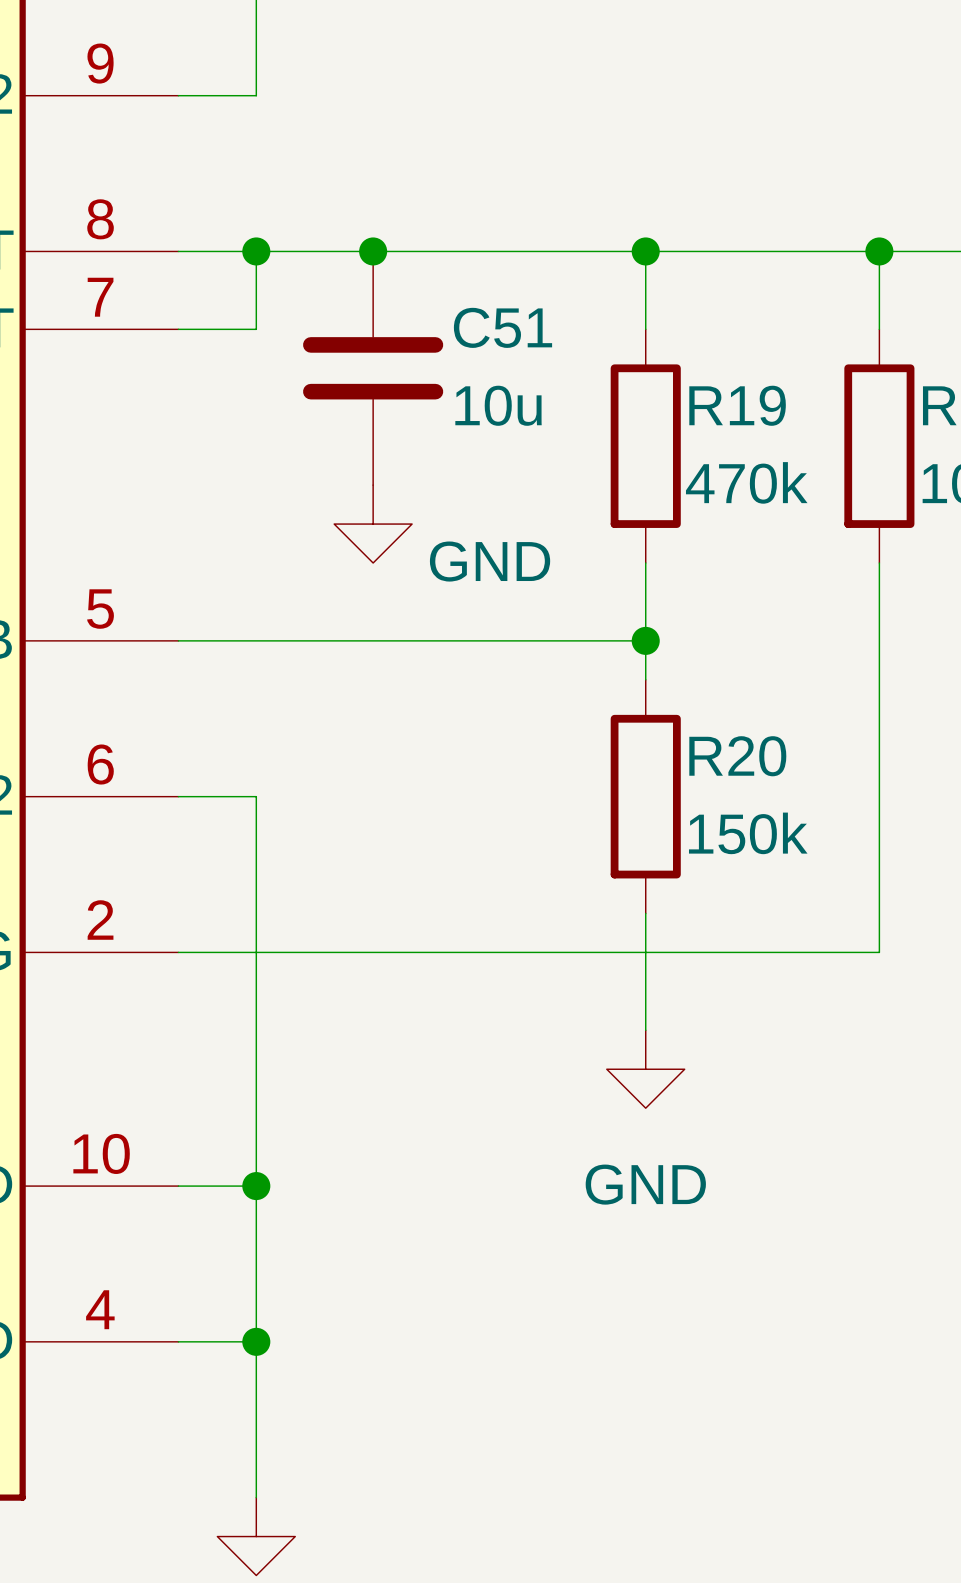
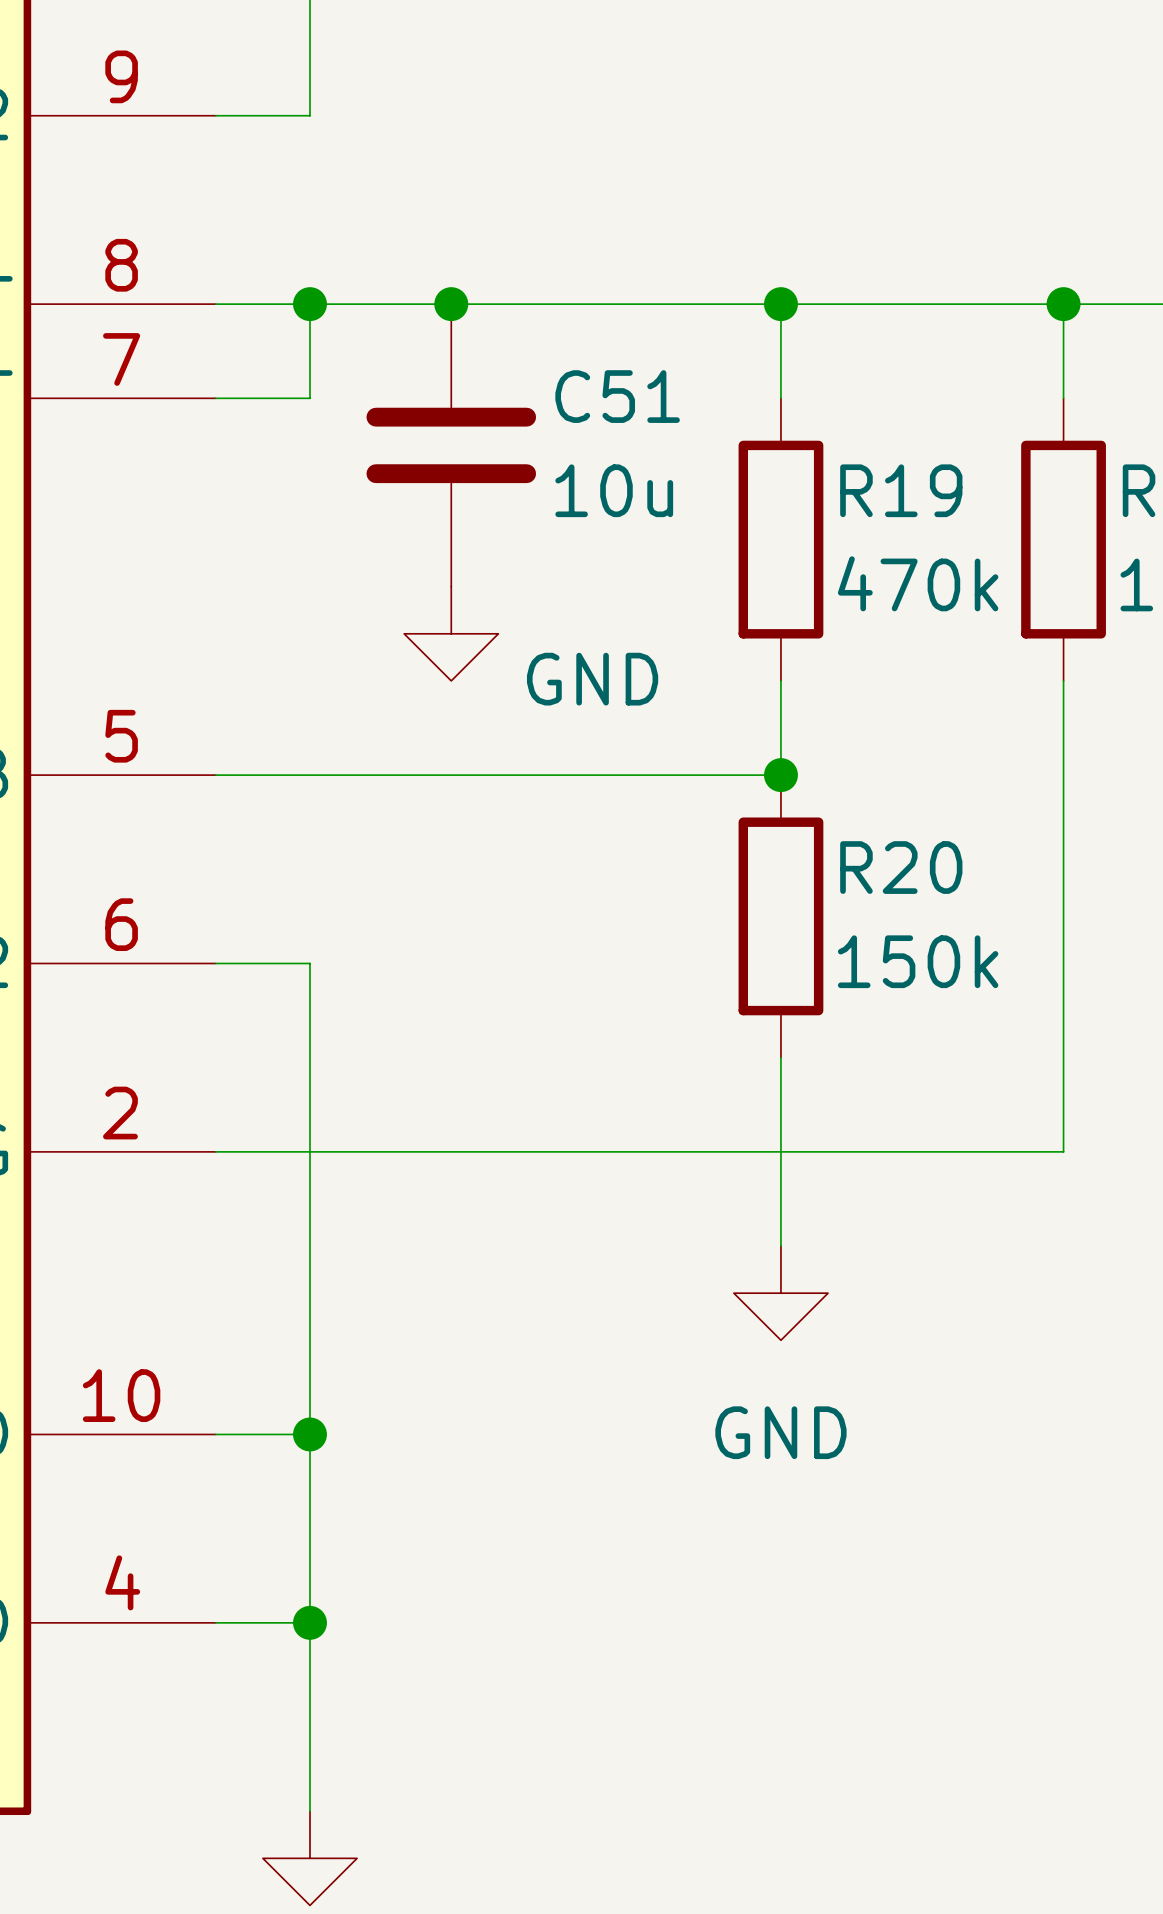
R20 position: (645, 796) -> (780, 916)

